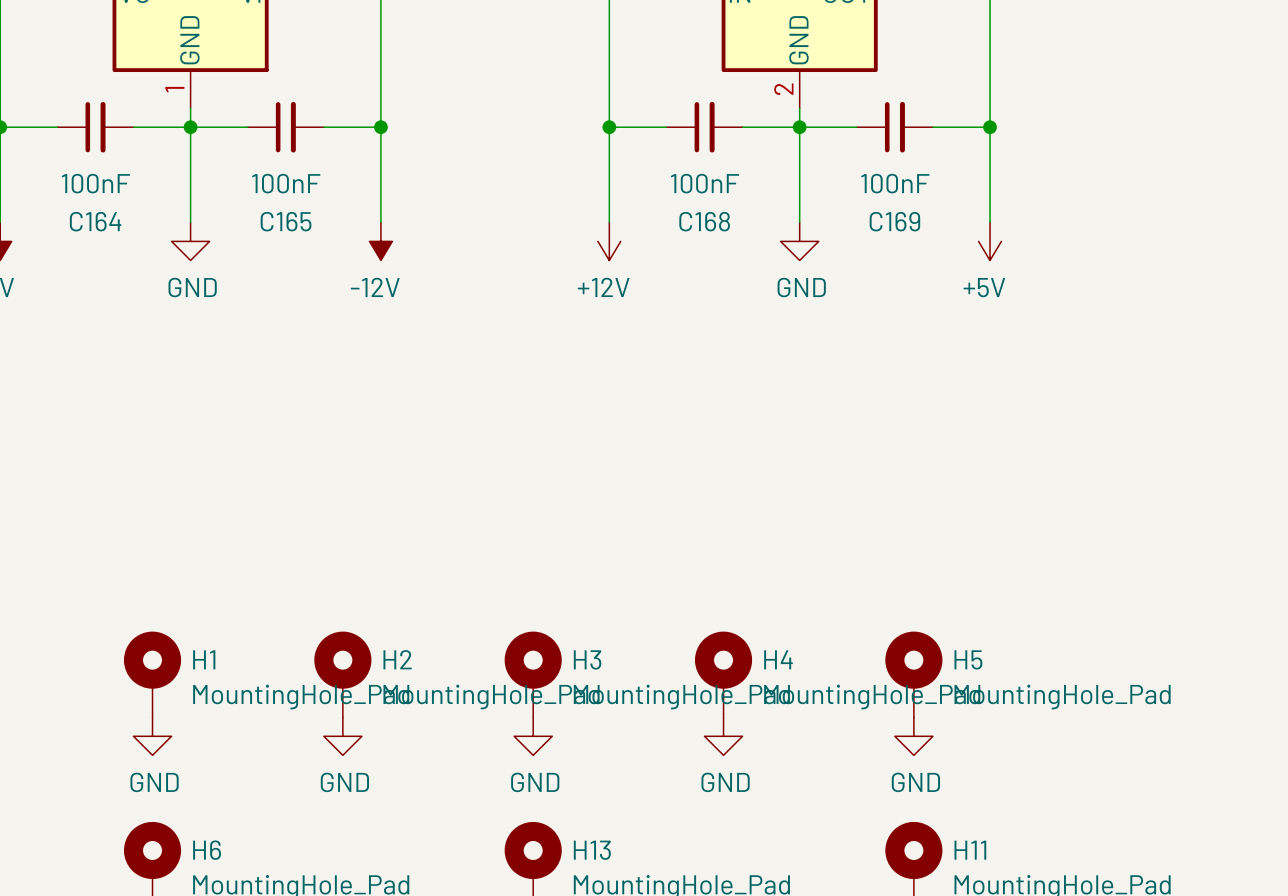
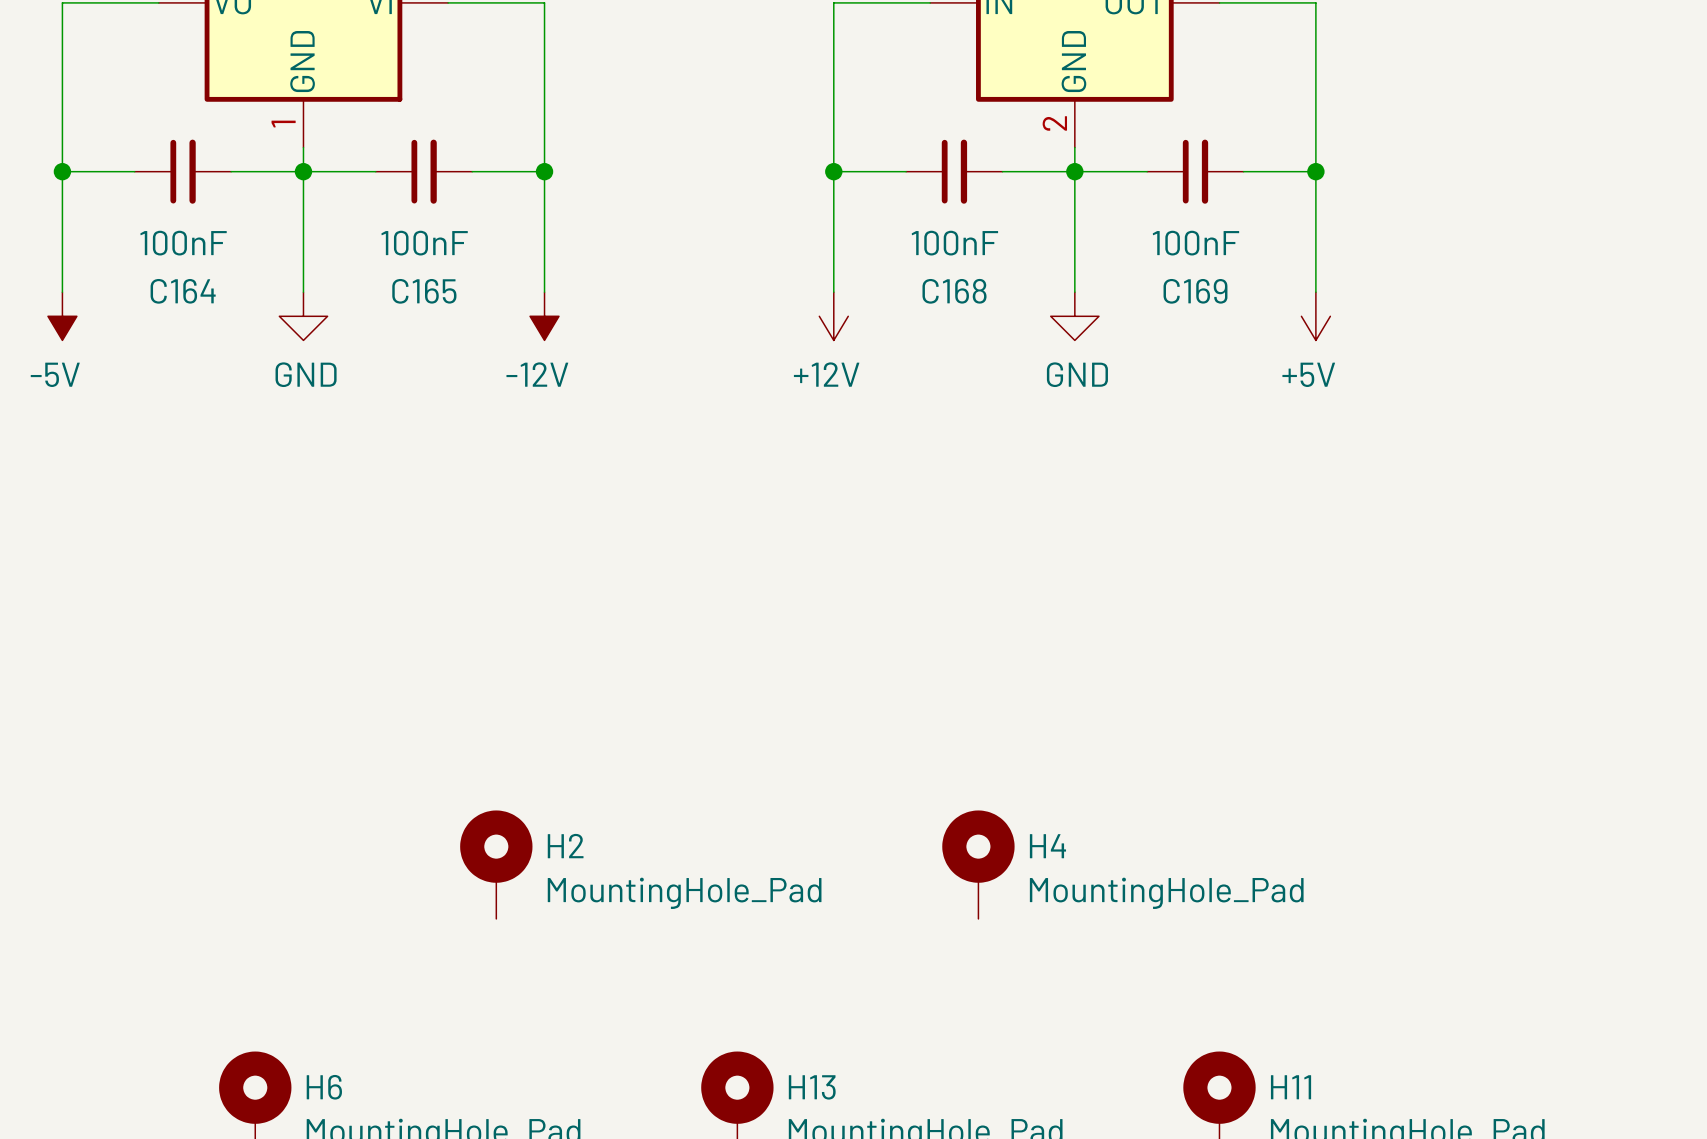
H1: MountingHole_Pad (152, 674) -> none
H3: MountingHole_Pad (533, 674) -> none
H5: MountingHole_Pad (913, 674) -> none
power symbol: GND (152, 736) -> none
power symbol: GND (342, 736) -> none
power symbol: GND (533, 736) -> none
power symbol: GND (723, 736) -> none
power symbol: GND (913, 736) -> none

